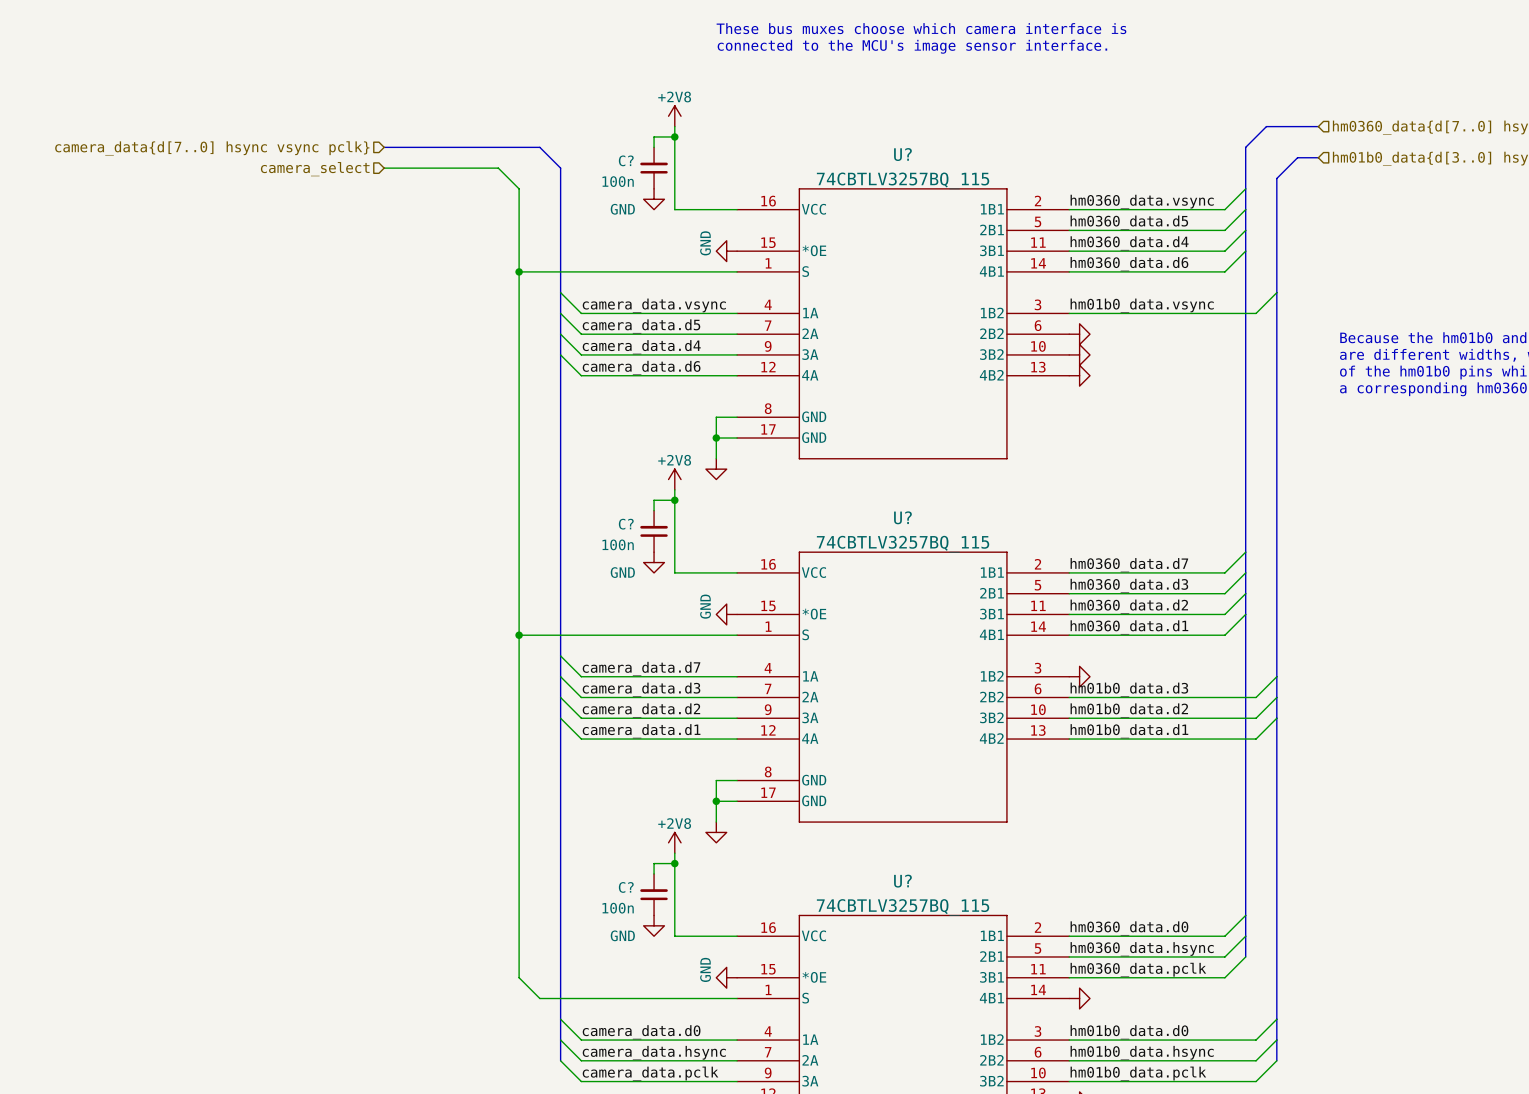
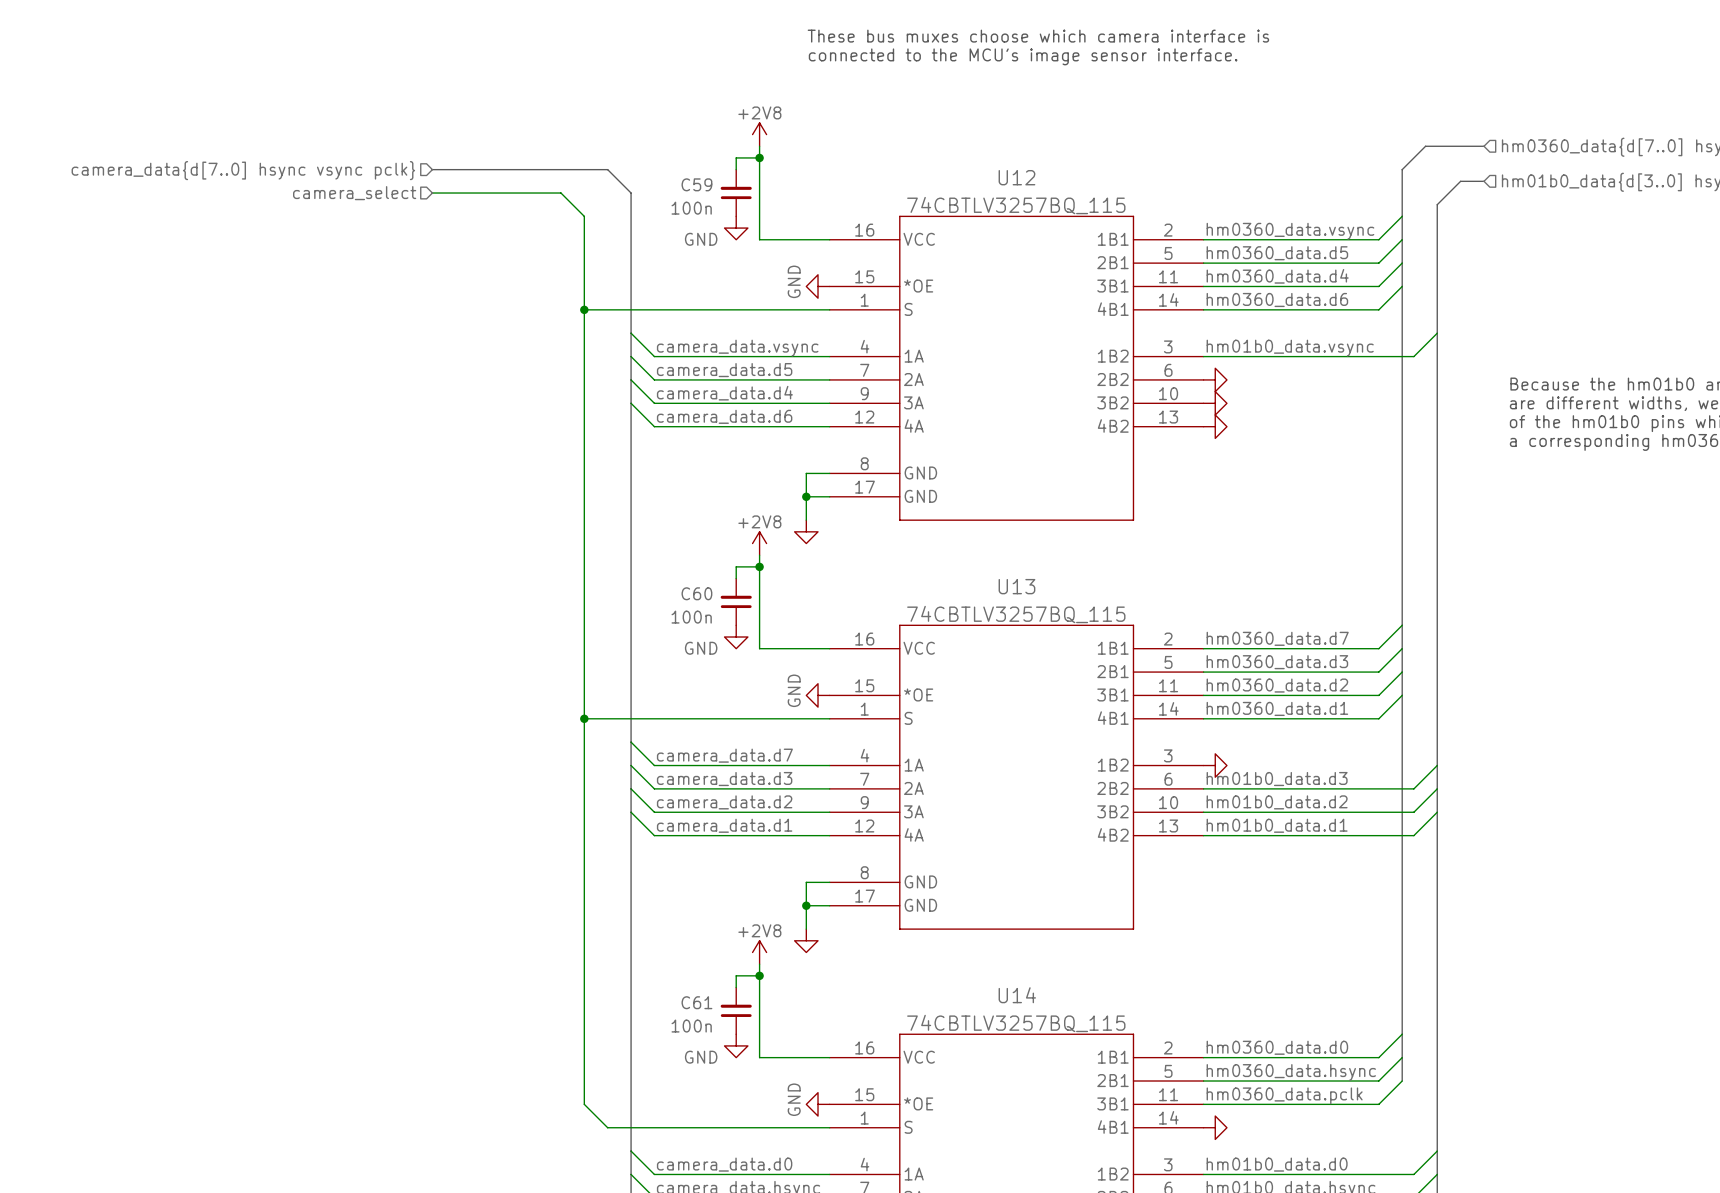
U? name: U? (902, 154) -> U12 (1016, 177)
C? name: C? (626, 160) -> C59 (696, 184)
U? name: U? (902, 517) -> U13 (1016, 586)
C? name: C? (626, 524) -> C60 (696, 593)
U? name: U? (902, 881) -> U14 (1017, 995)
C? name: C? (626, 887) -> C61 (696, 1002)

